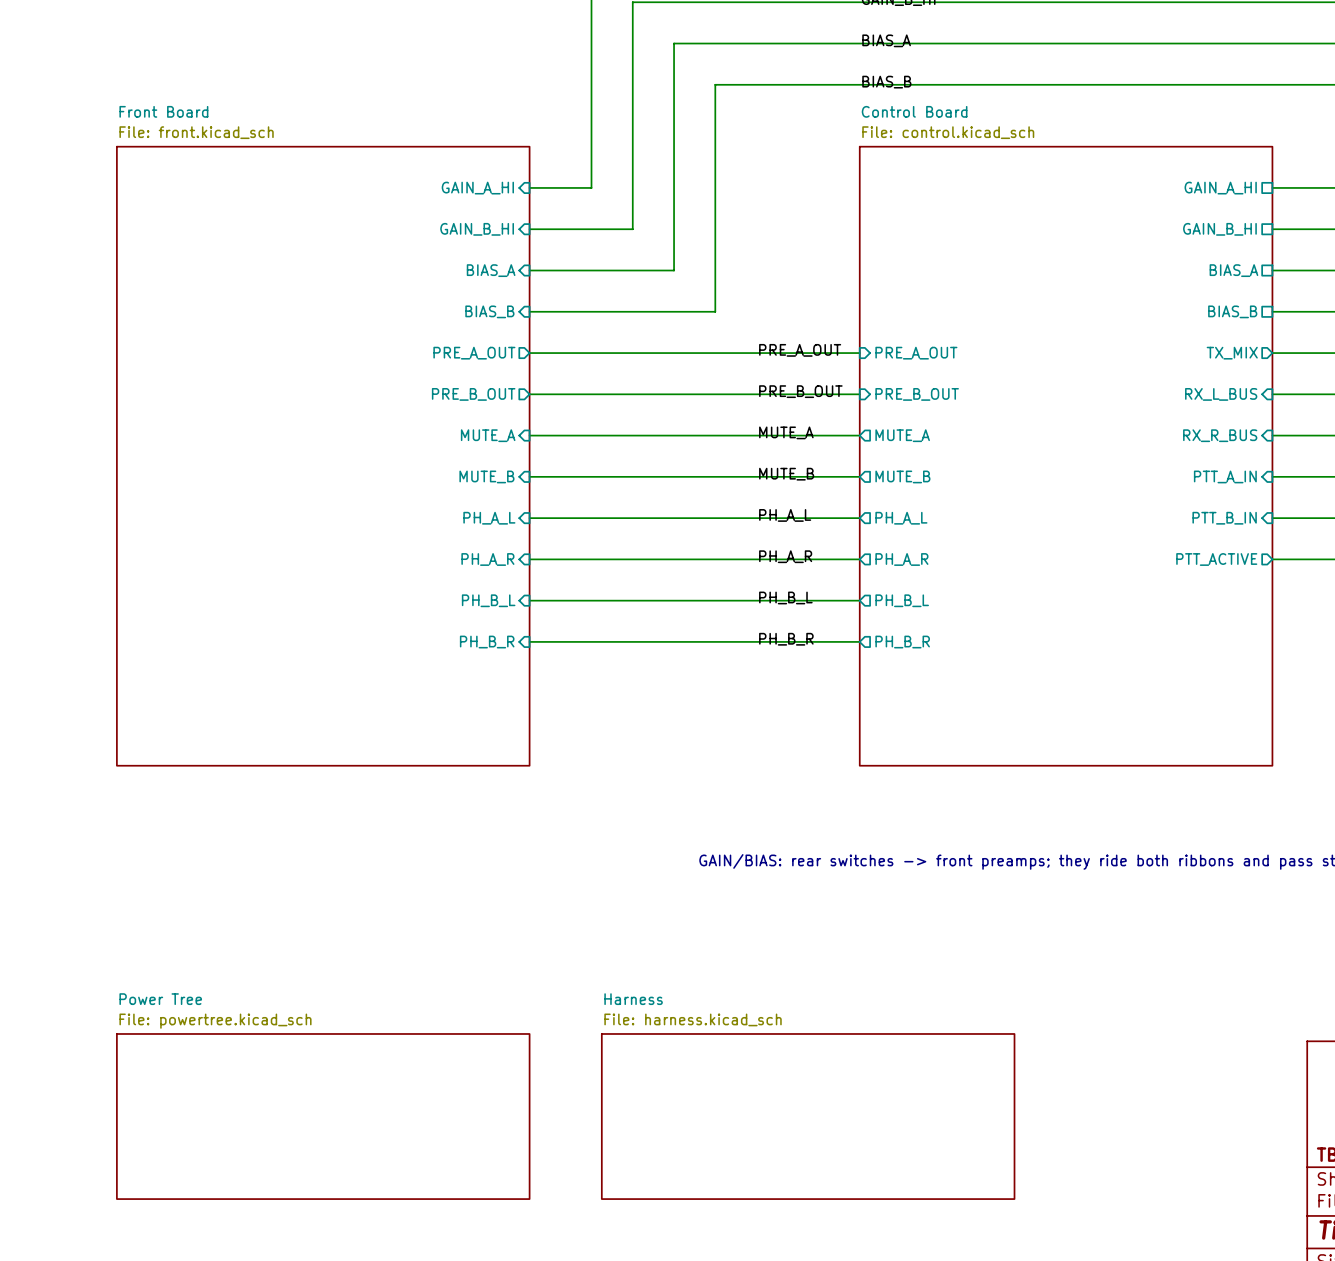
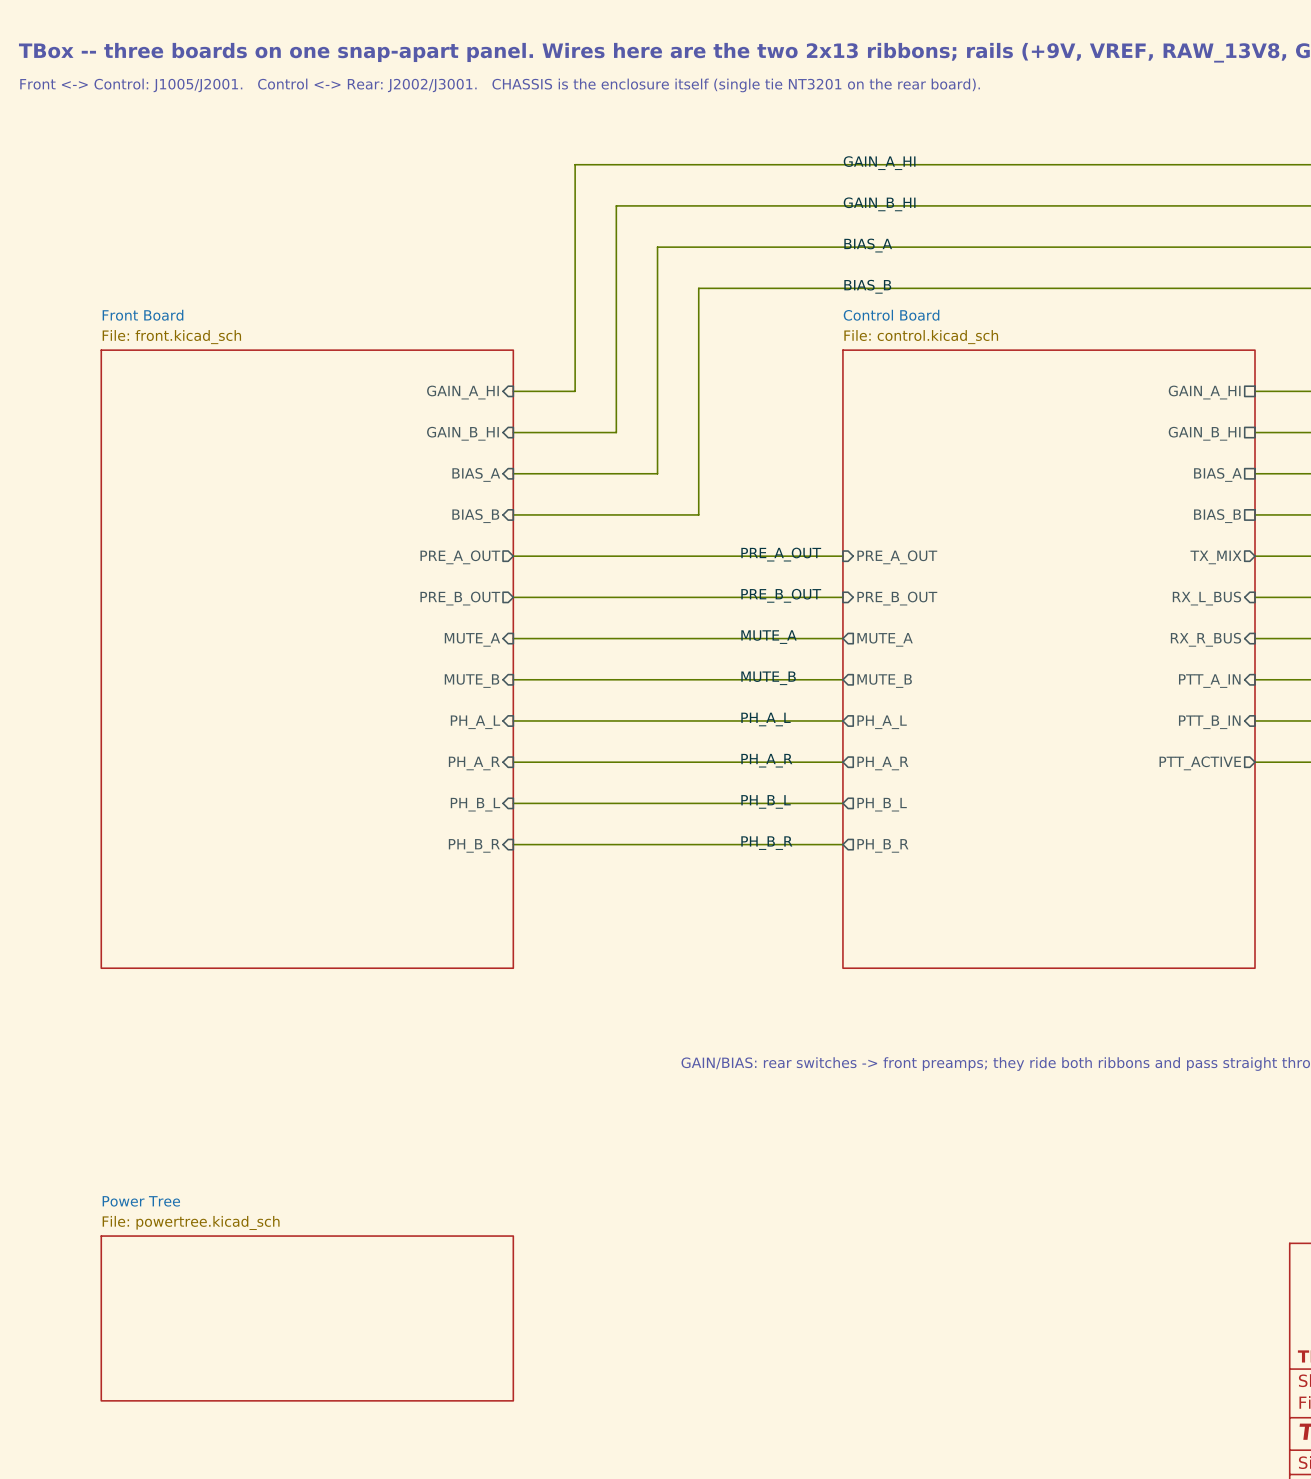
sheet Harness: File: harness.kicad_sch (808, 1116) -> none

